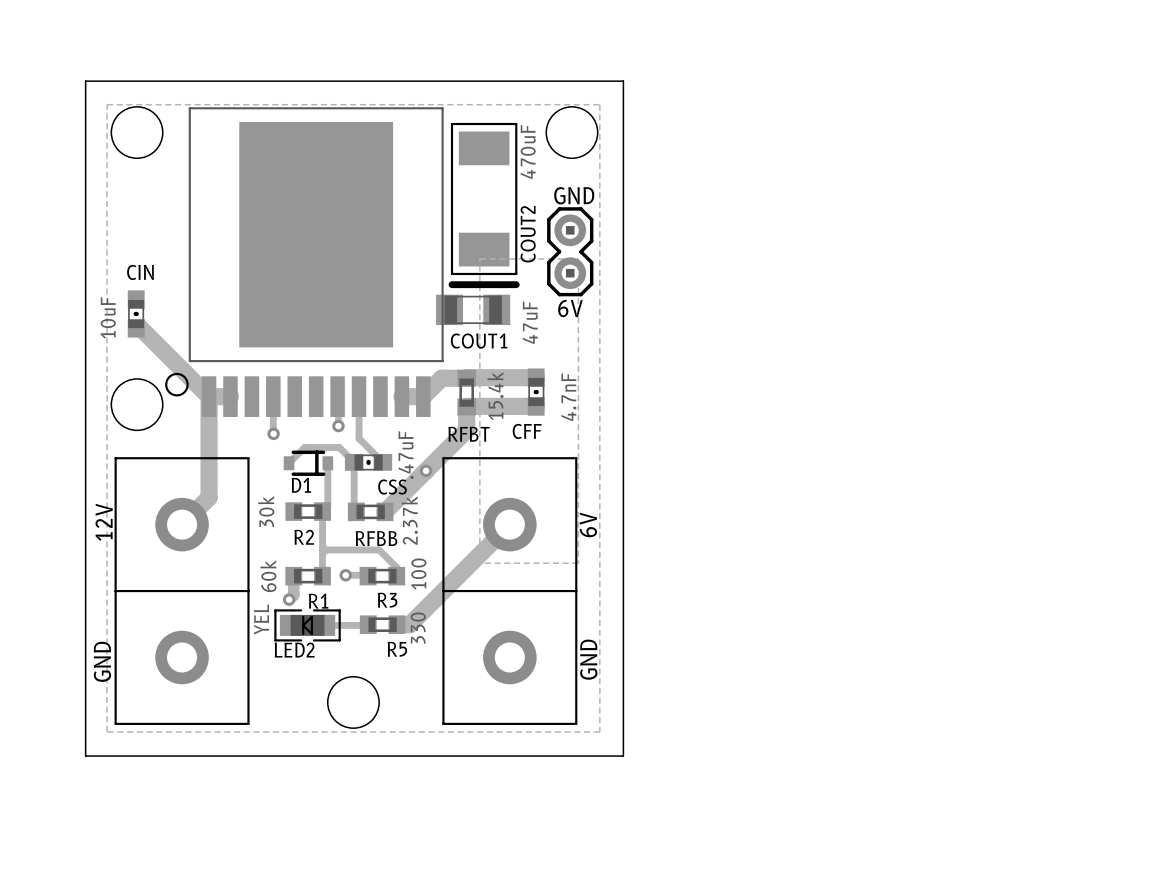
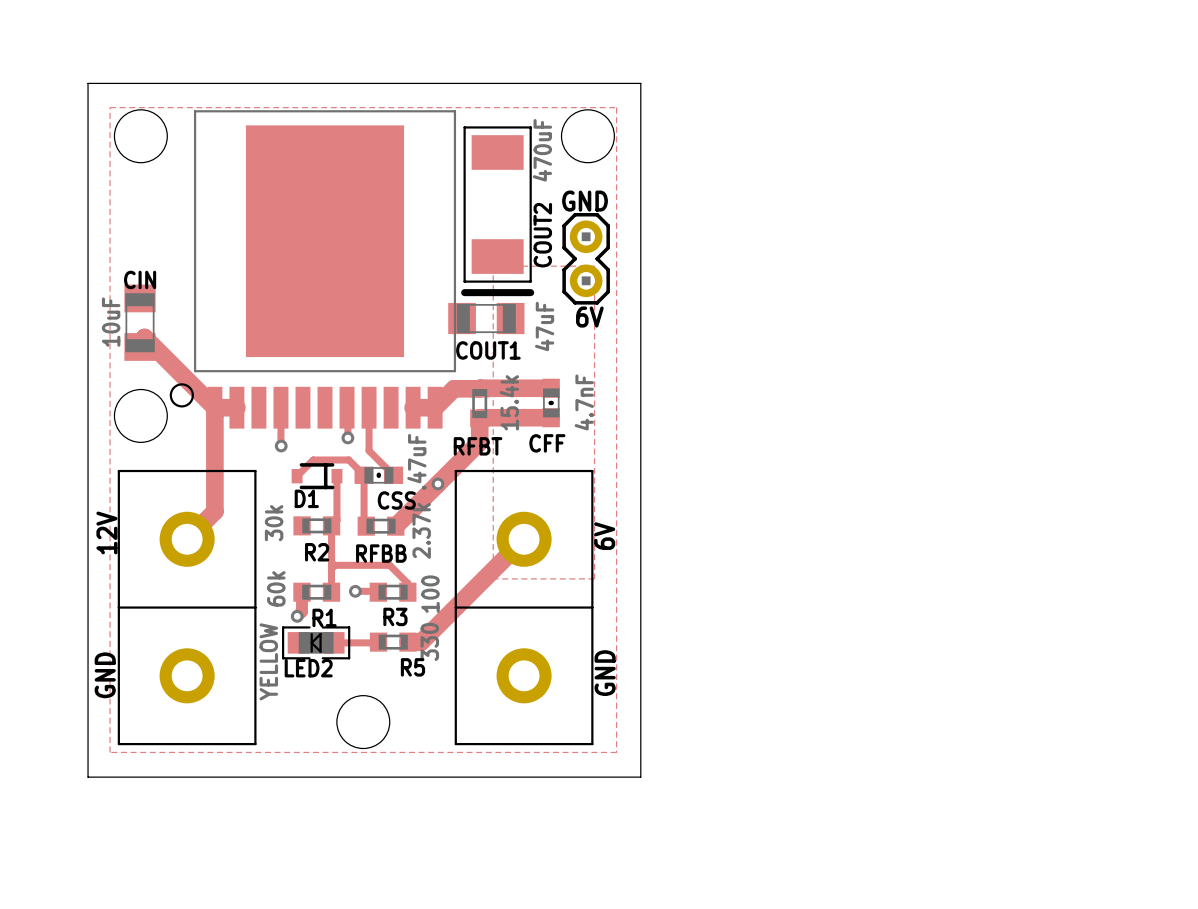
CIN footprint: [127, 290, 145, 338] -> [124, 284, 156, 361]
LED2 value: YEL (261, 619) -> YELLOW (268, 661)

